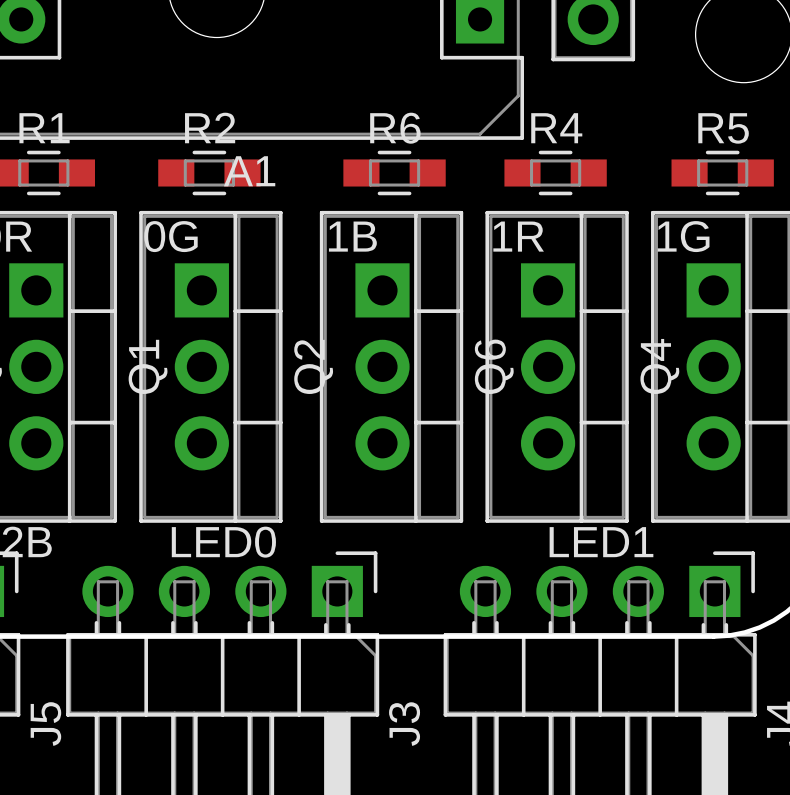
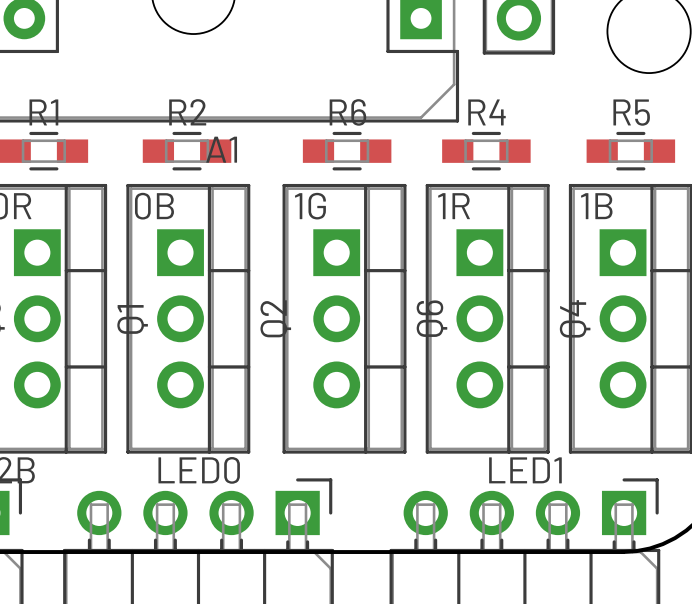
text: 0G (170, 236) -> 0B (154, 206)
text: 1B (352, 236) -> 1G (310, 206)
text: 1G (683, 236) -> 1B (596, 206)

